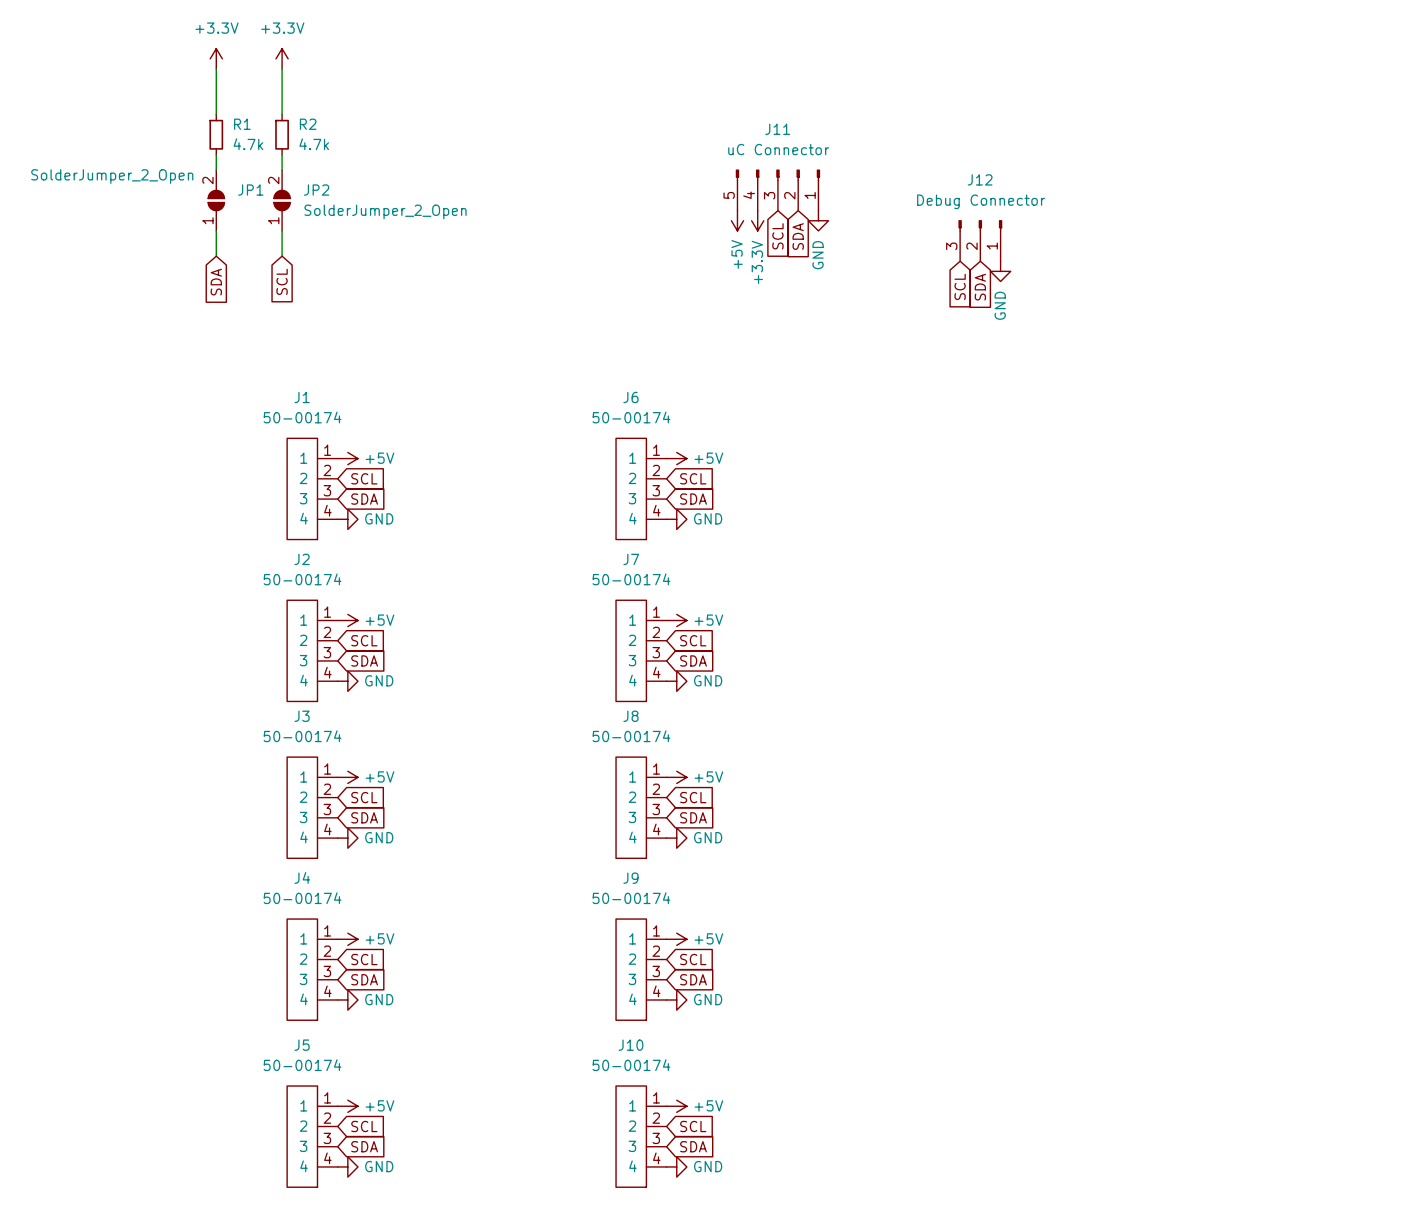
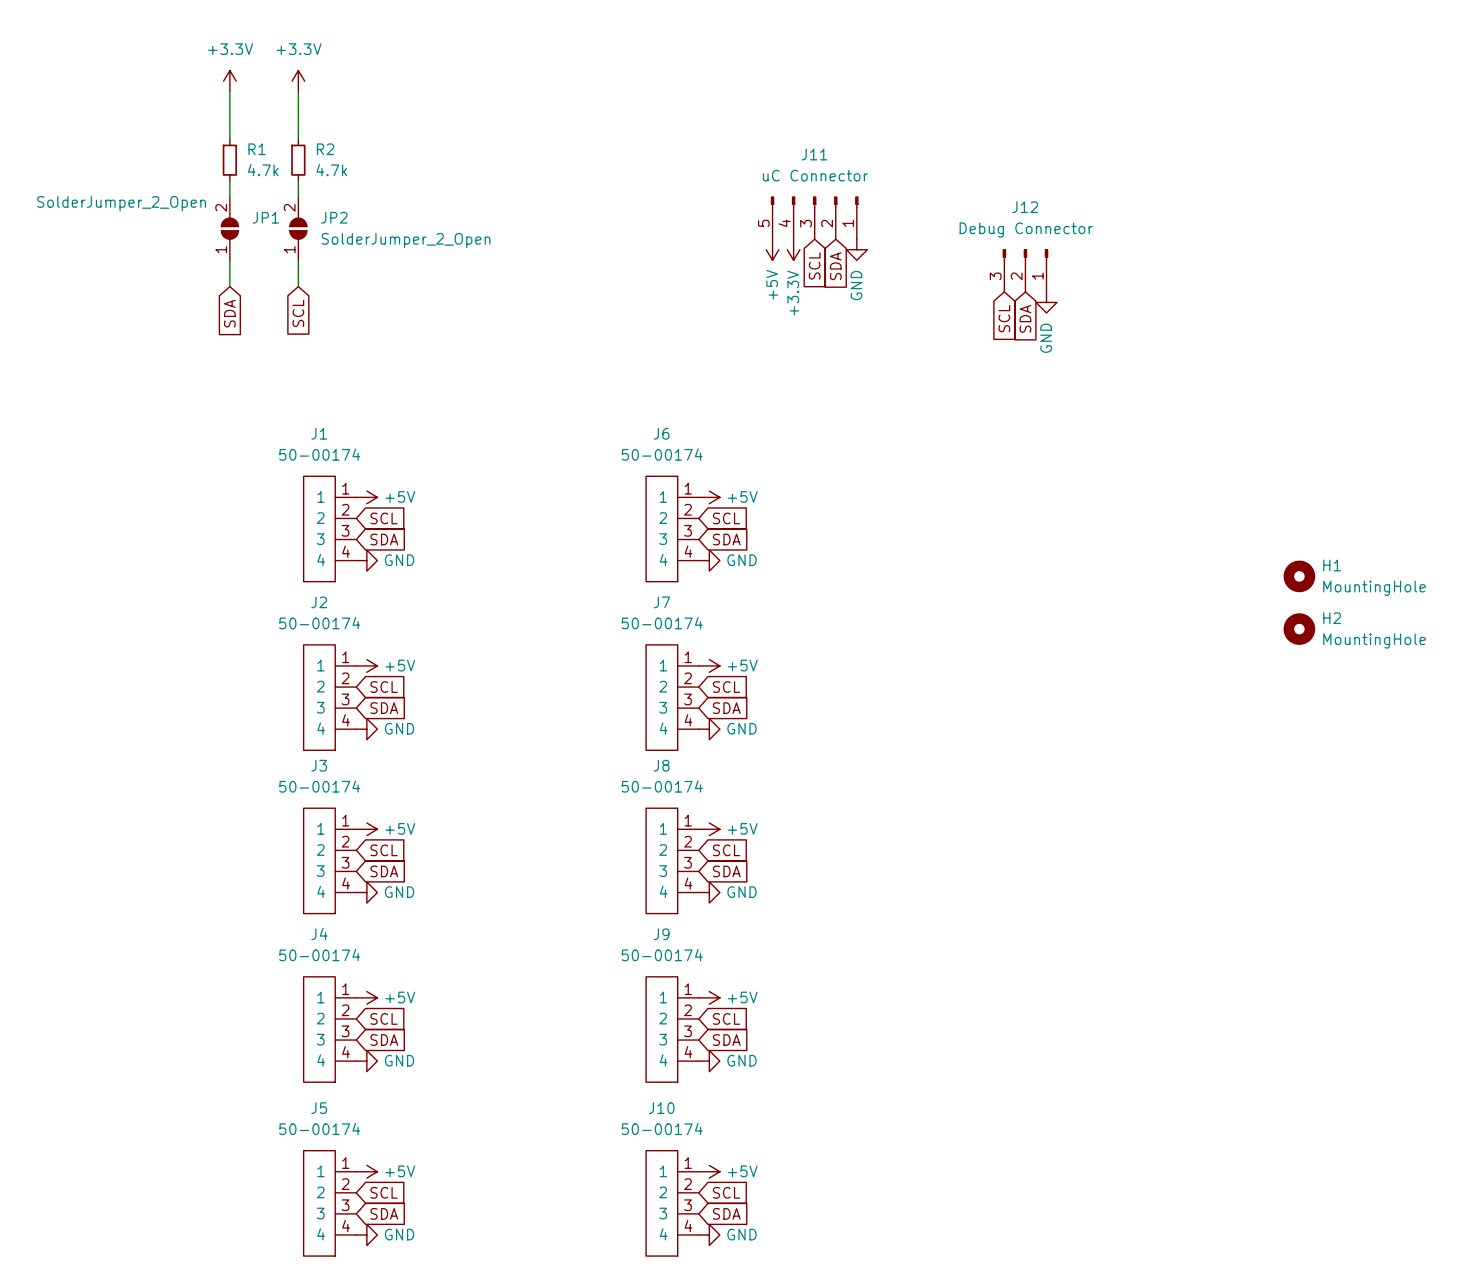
H1: none -> MountingHole (1299, 576)
H2: none -> MountingHole (1299, 629)

